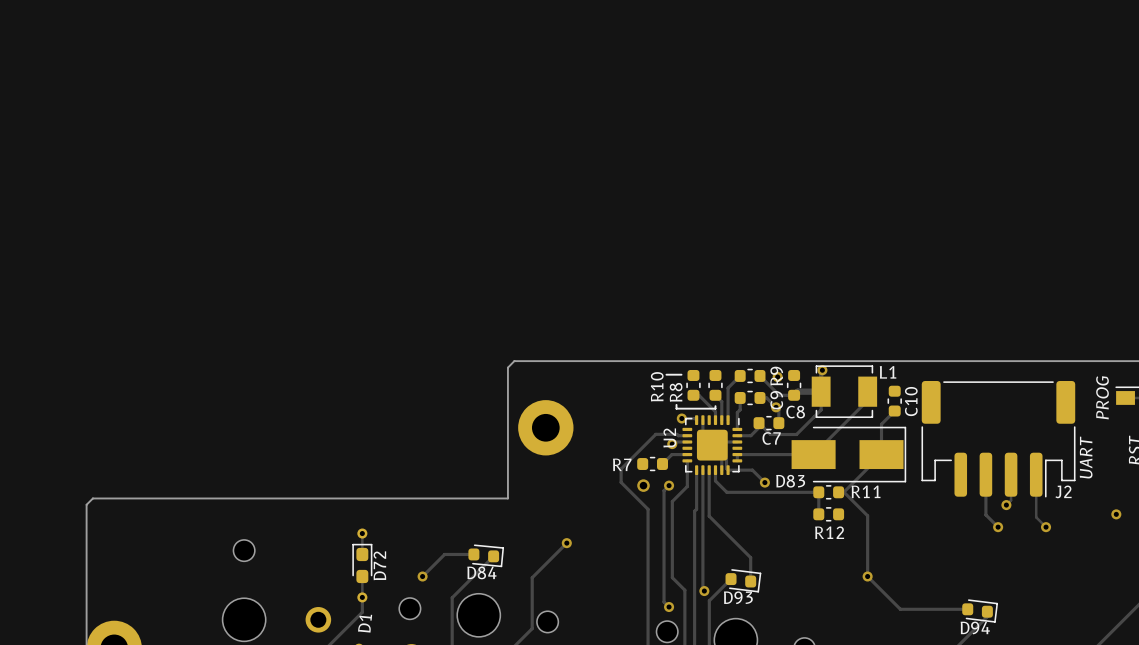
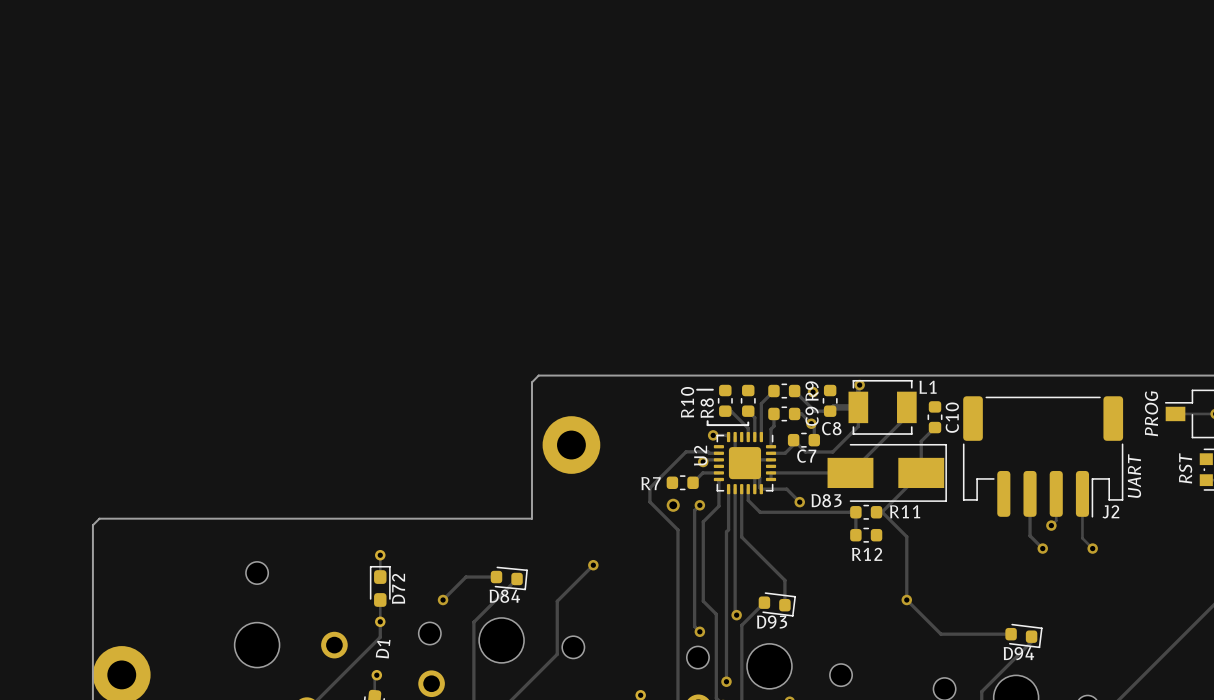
via: (1116, 514) -> none

